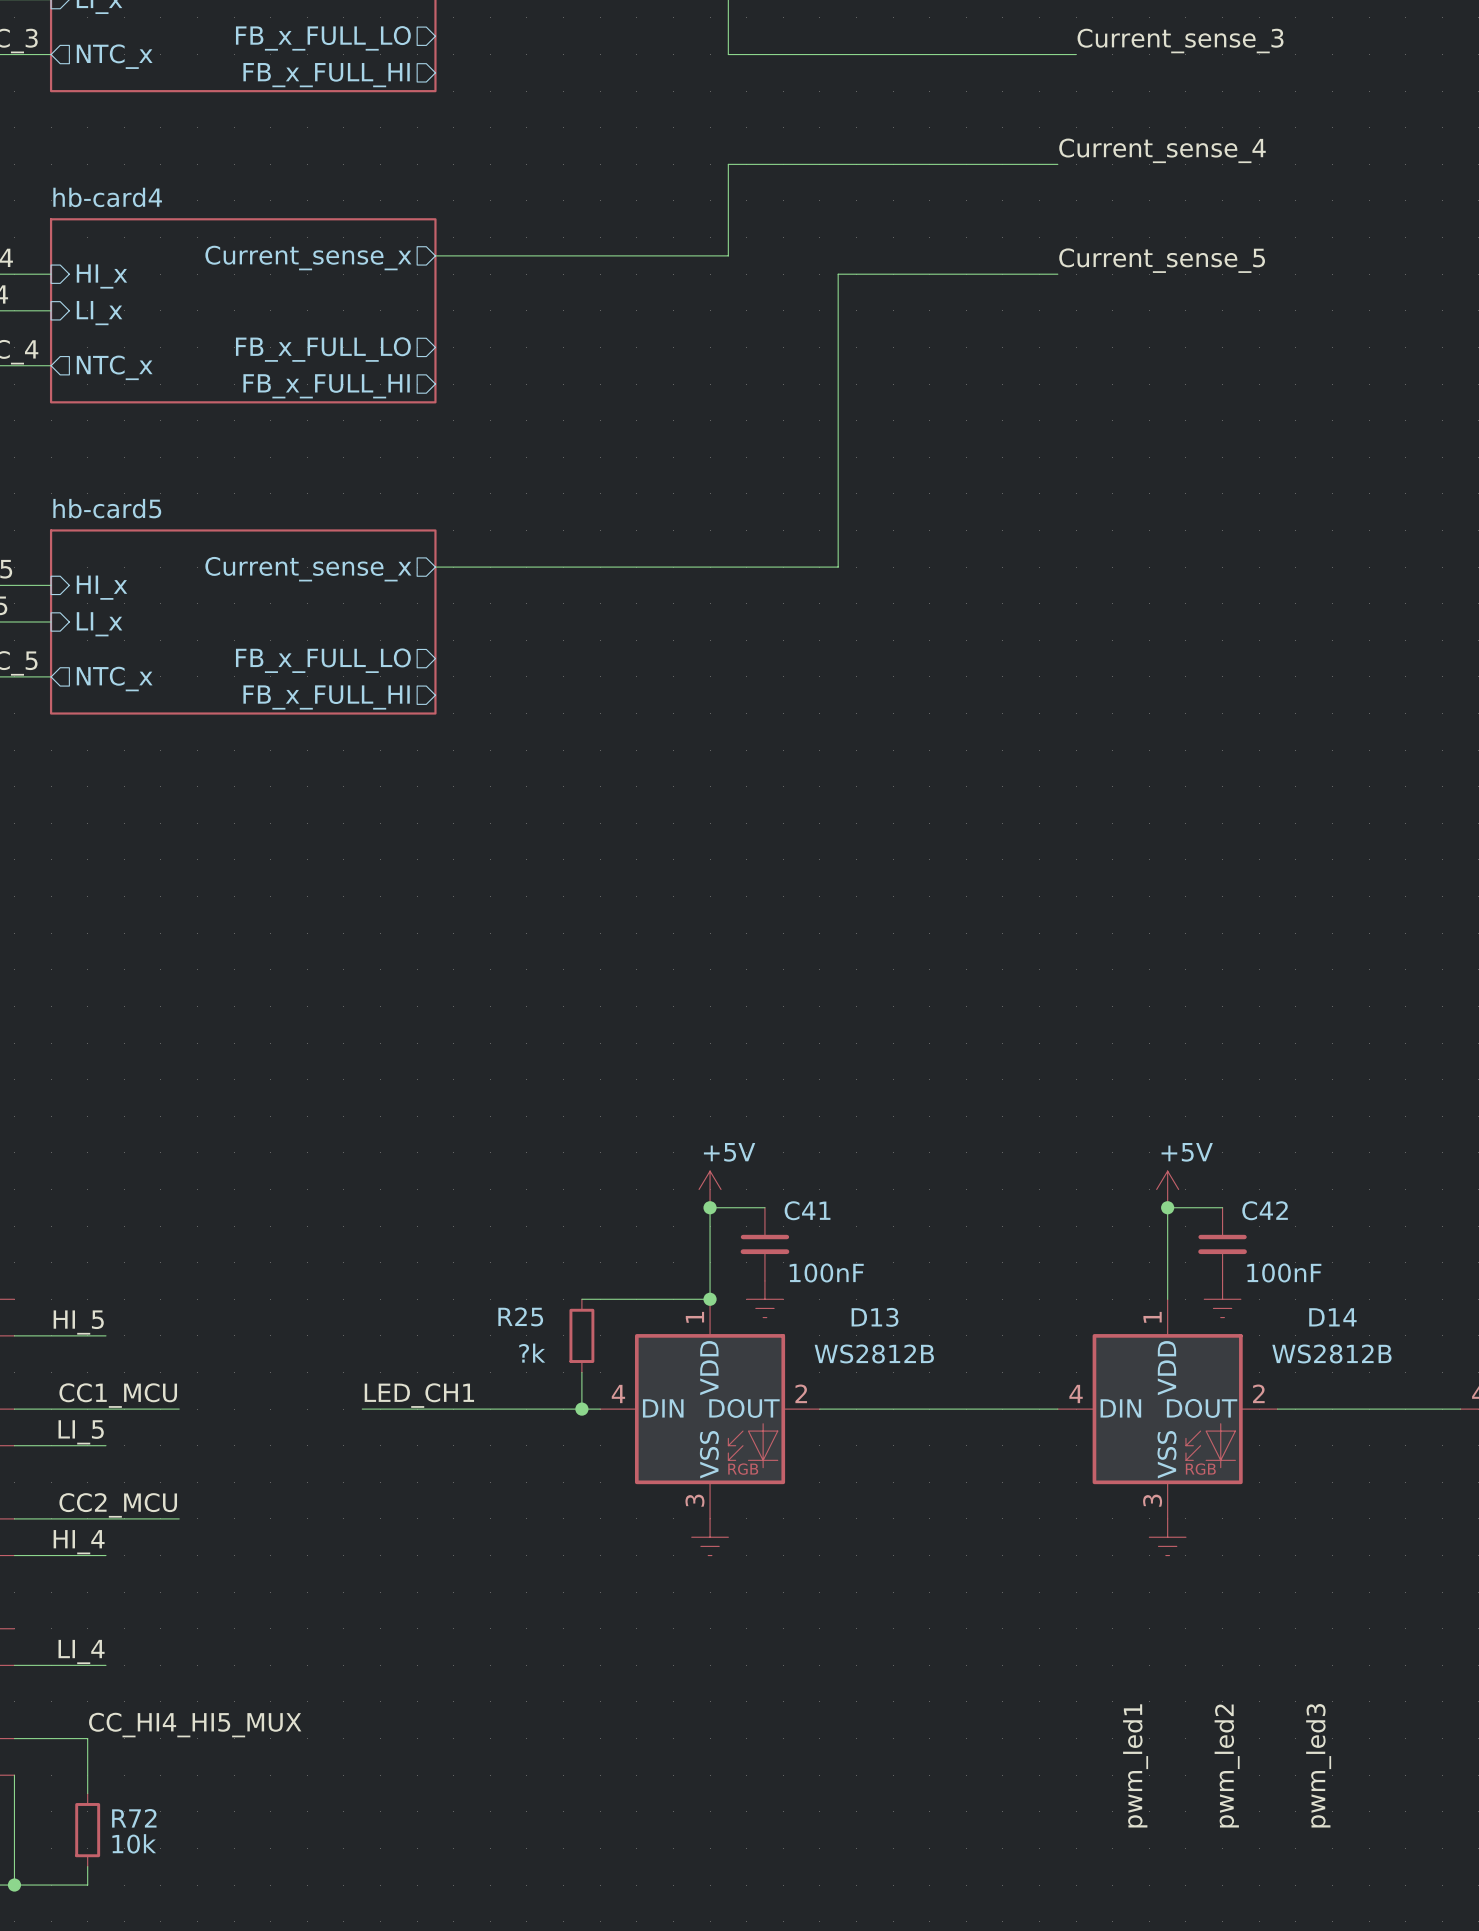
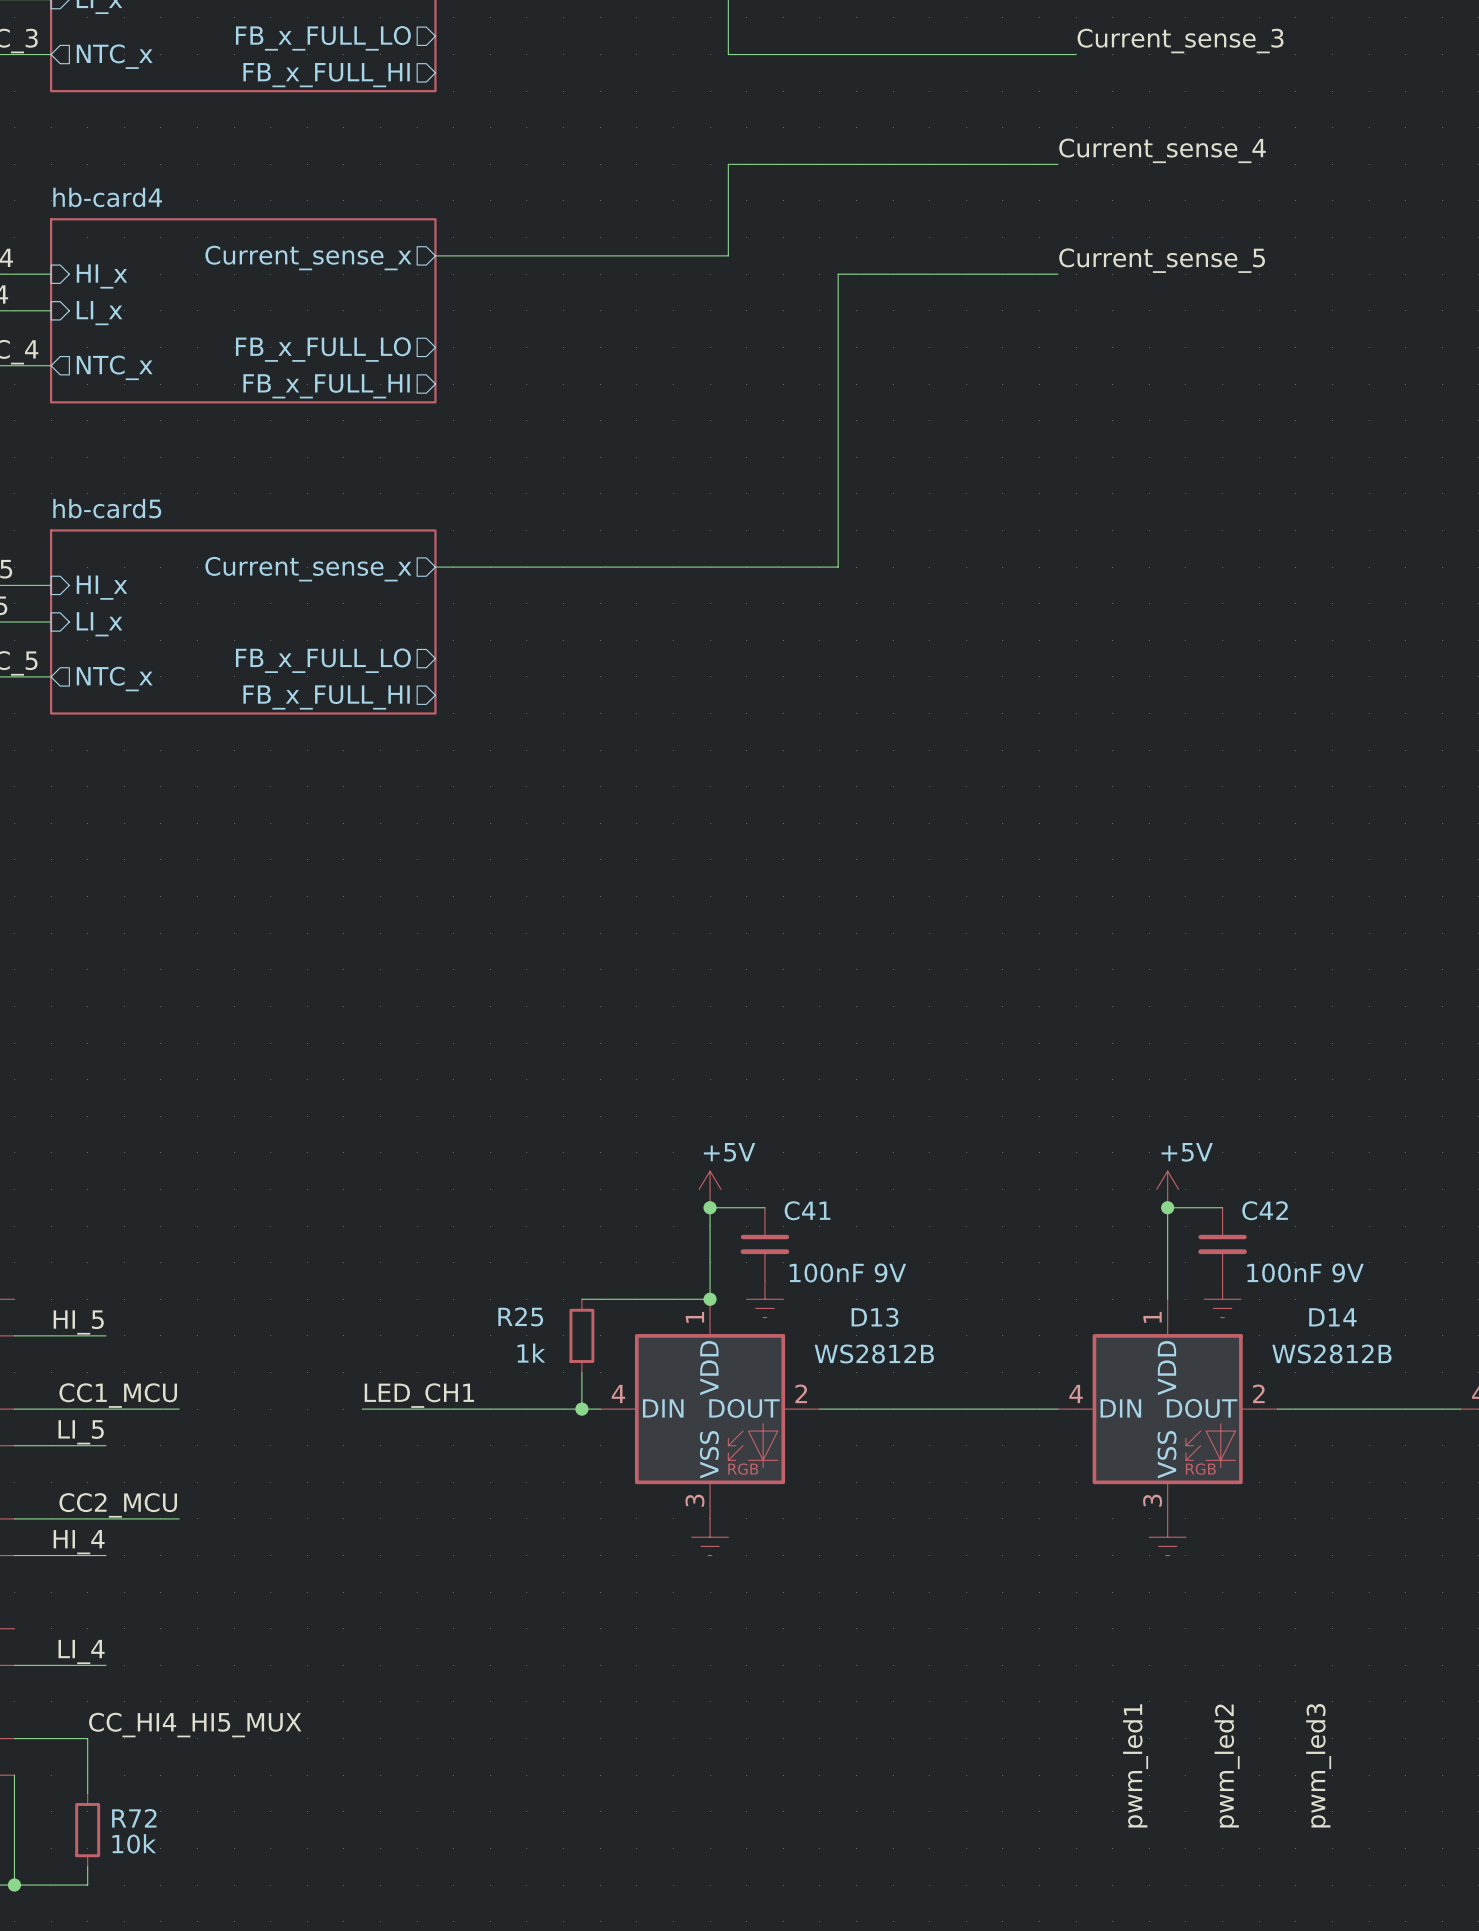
C41 value: 100nF (826, 1272) -> 100nF 9V (847, 1272)
C42 value: 100nF (1284, 1272) -> 100nF 9V (1305, 1272)
R25 value: ?k (532, 1353) -> 1k (531, 1353)

